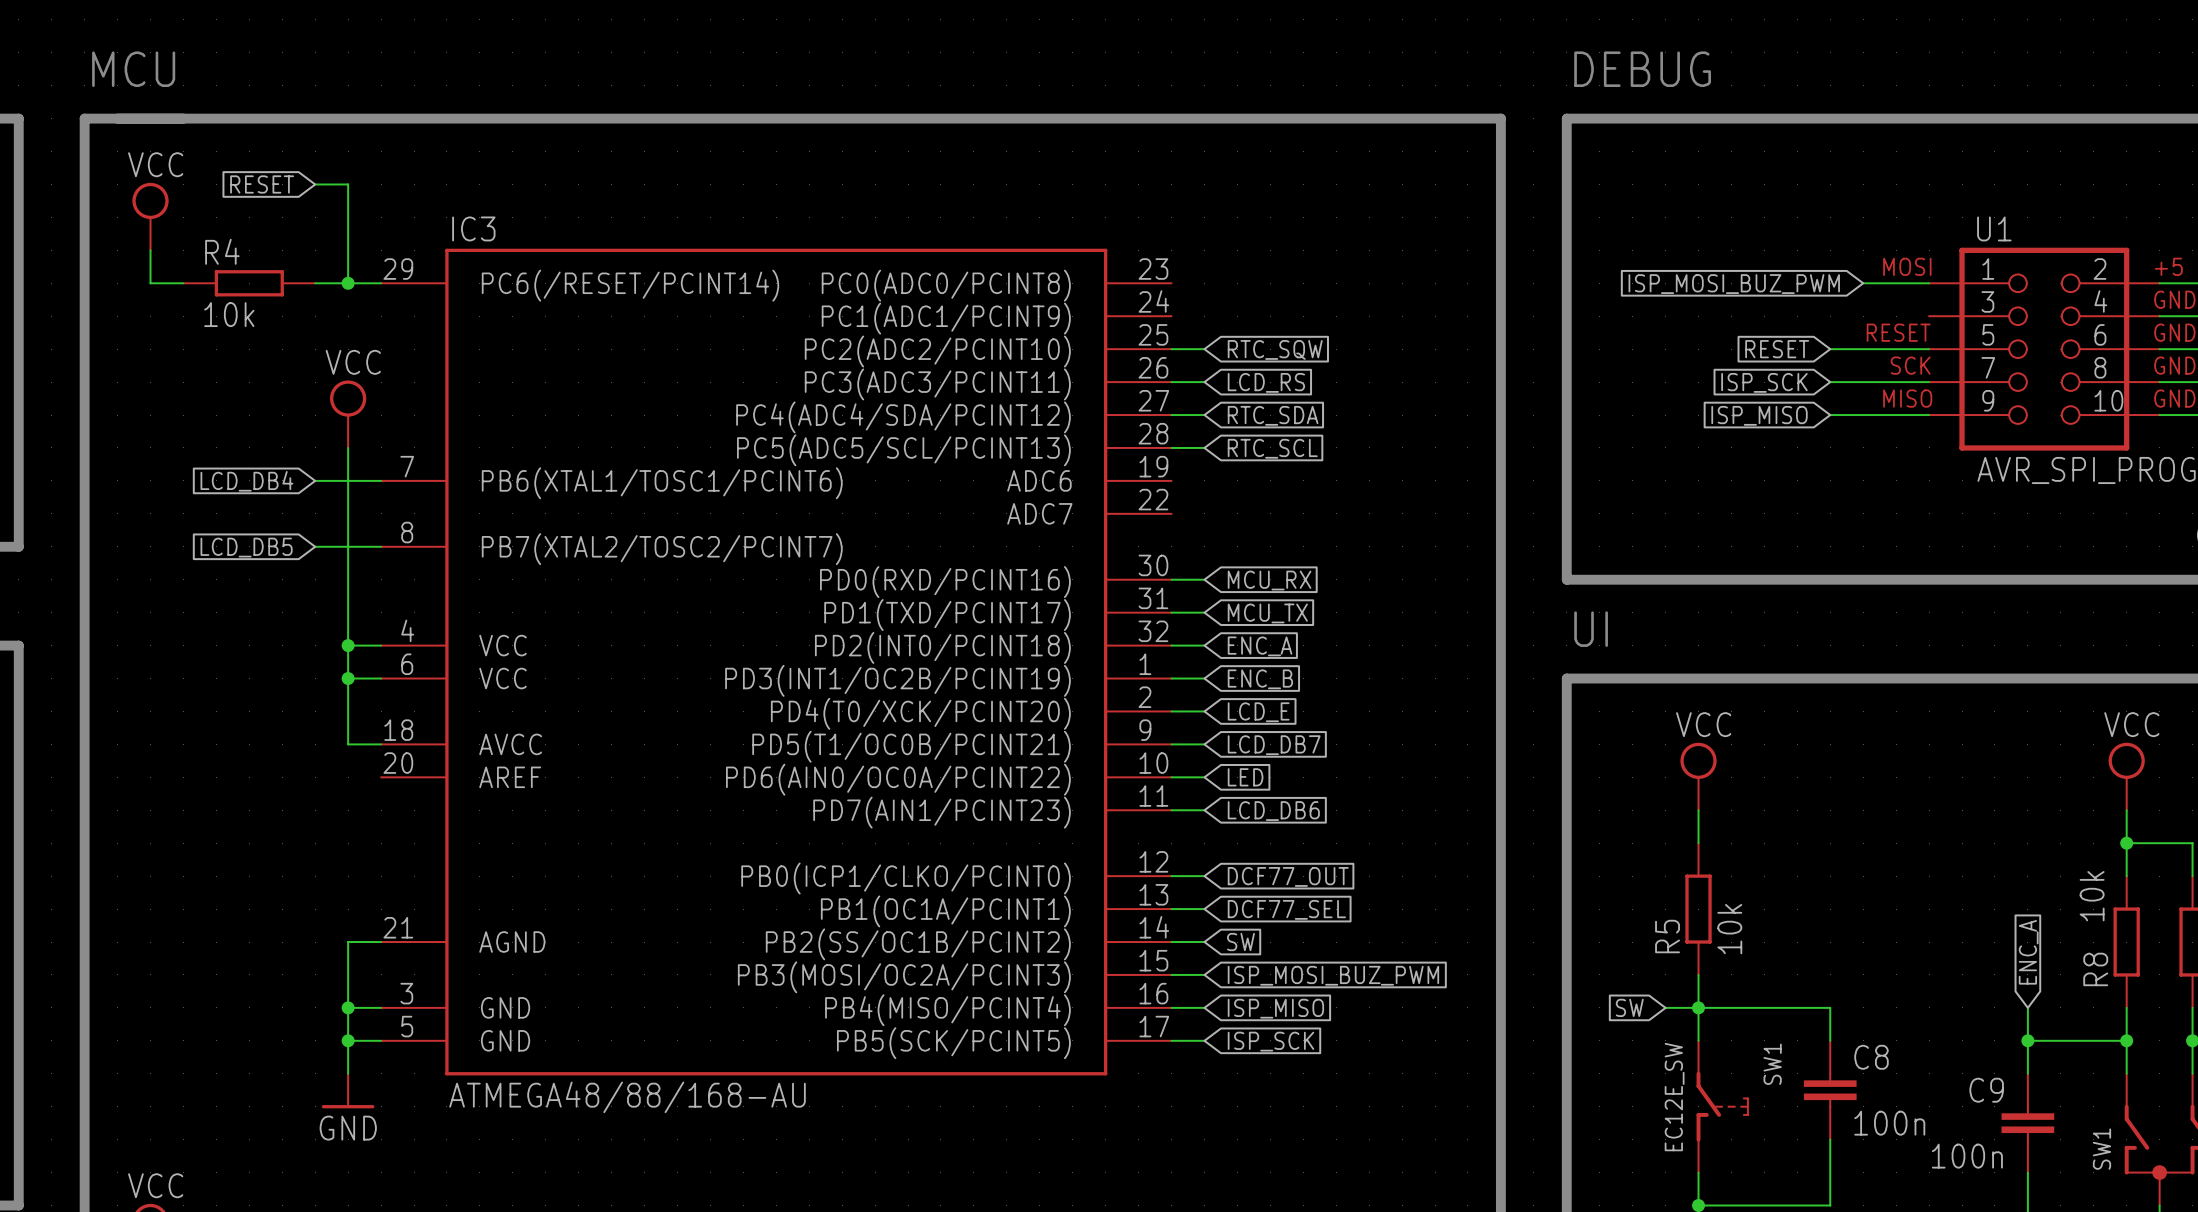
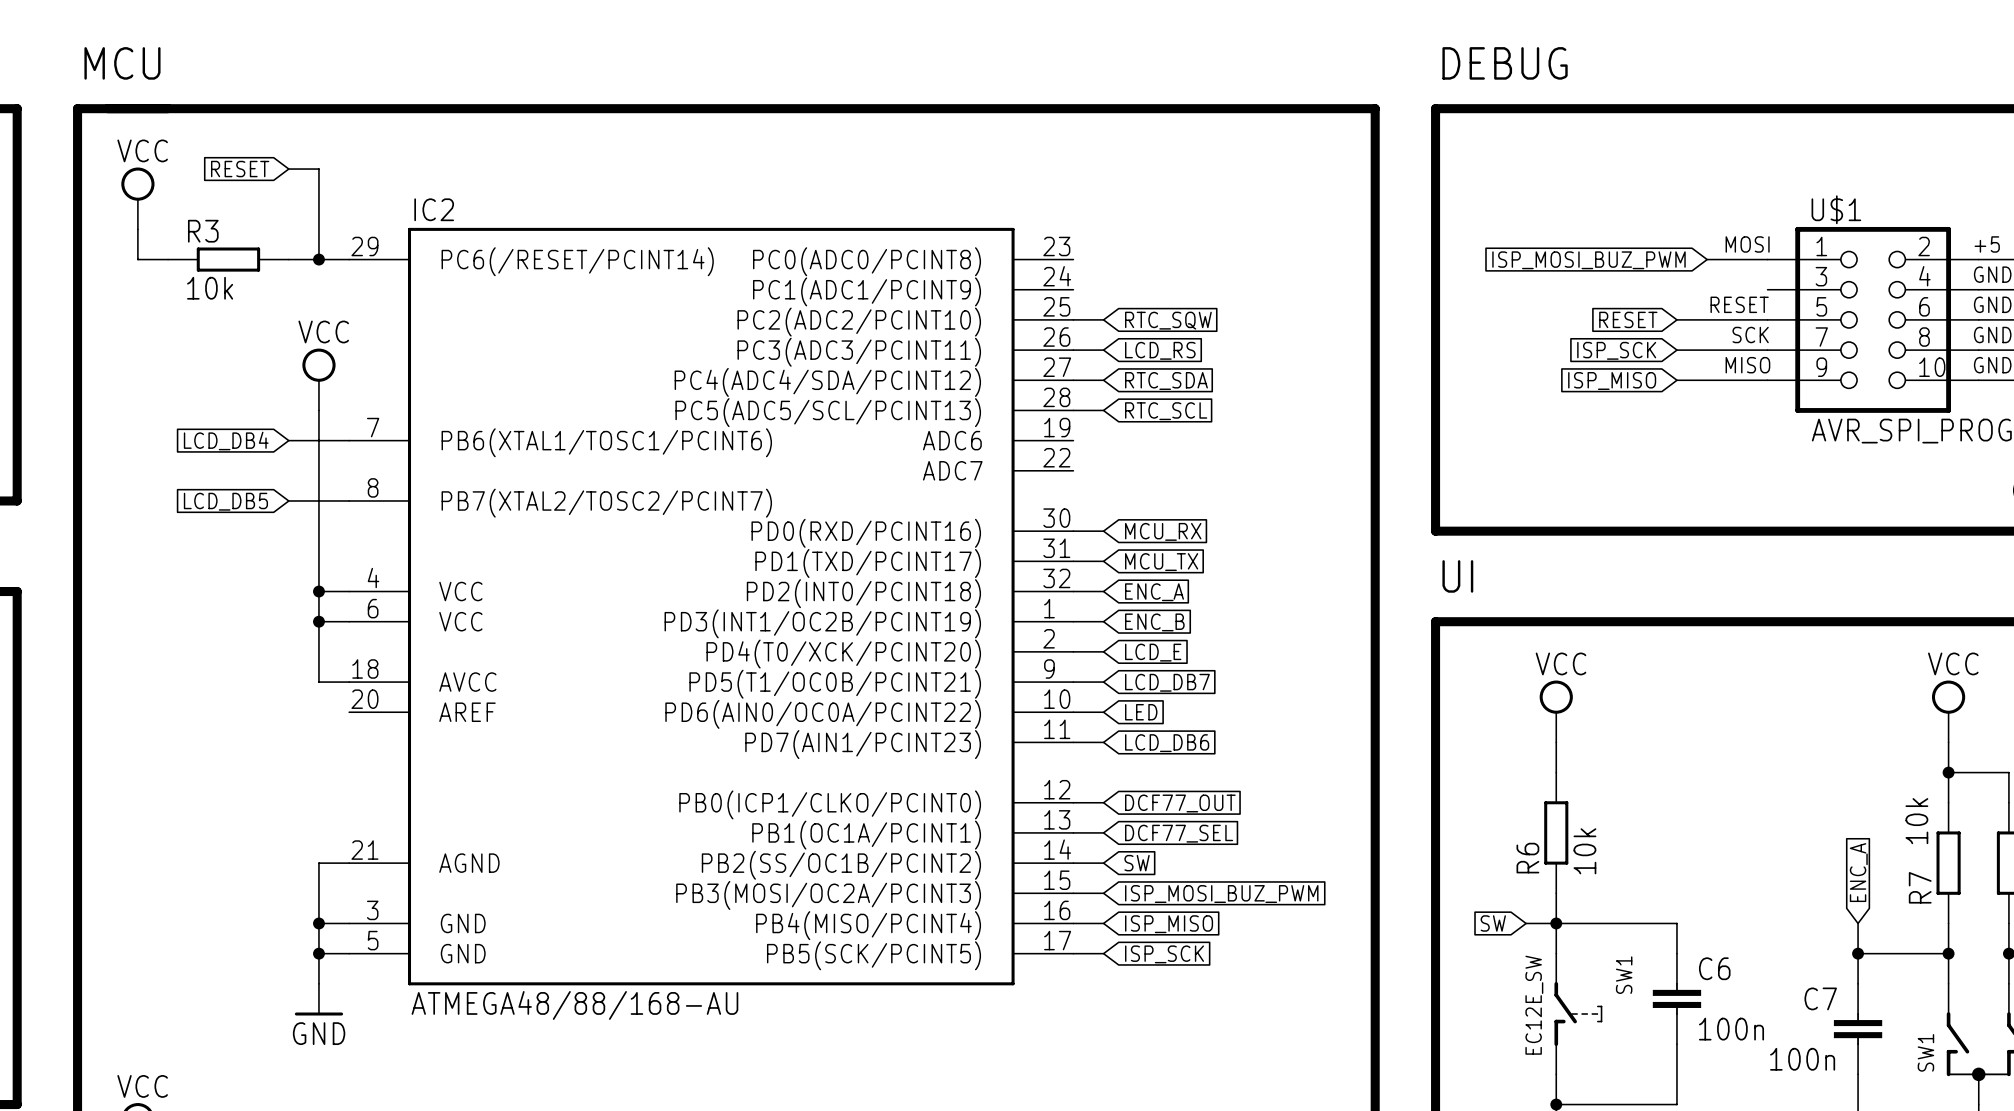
IC3 name: IC3 (473, 228) -> IC2 (434, 209)
U1 name: U1 (1994, 228) -> U$1 (1836, 209)
R4 name: R4 (222, 251) -> R3 (203, 231)
R5 name: R5 (1667, 936) -> R6 (1527, 858)
R8 name: R8 (2095, 969) -> R7 (1920, 887)
C8 name: C8 (1871, 1057) -> C6 (1714, 968)
C9 name: C9 (1986, 1090) -> C7 (1820, 998)

